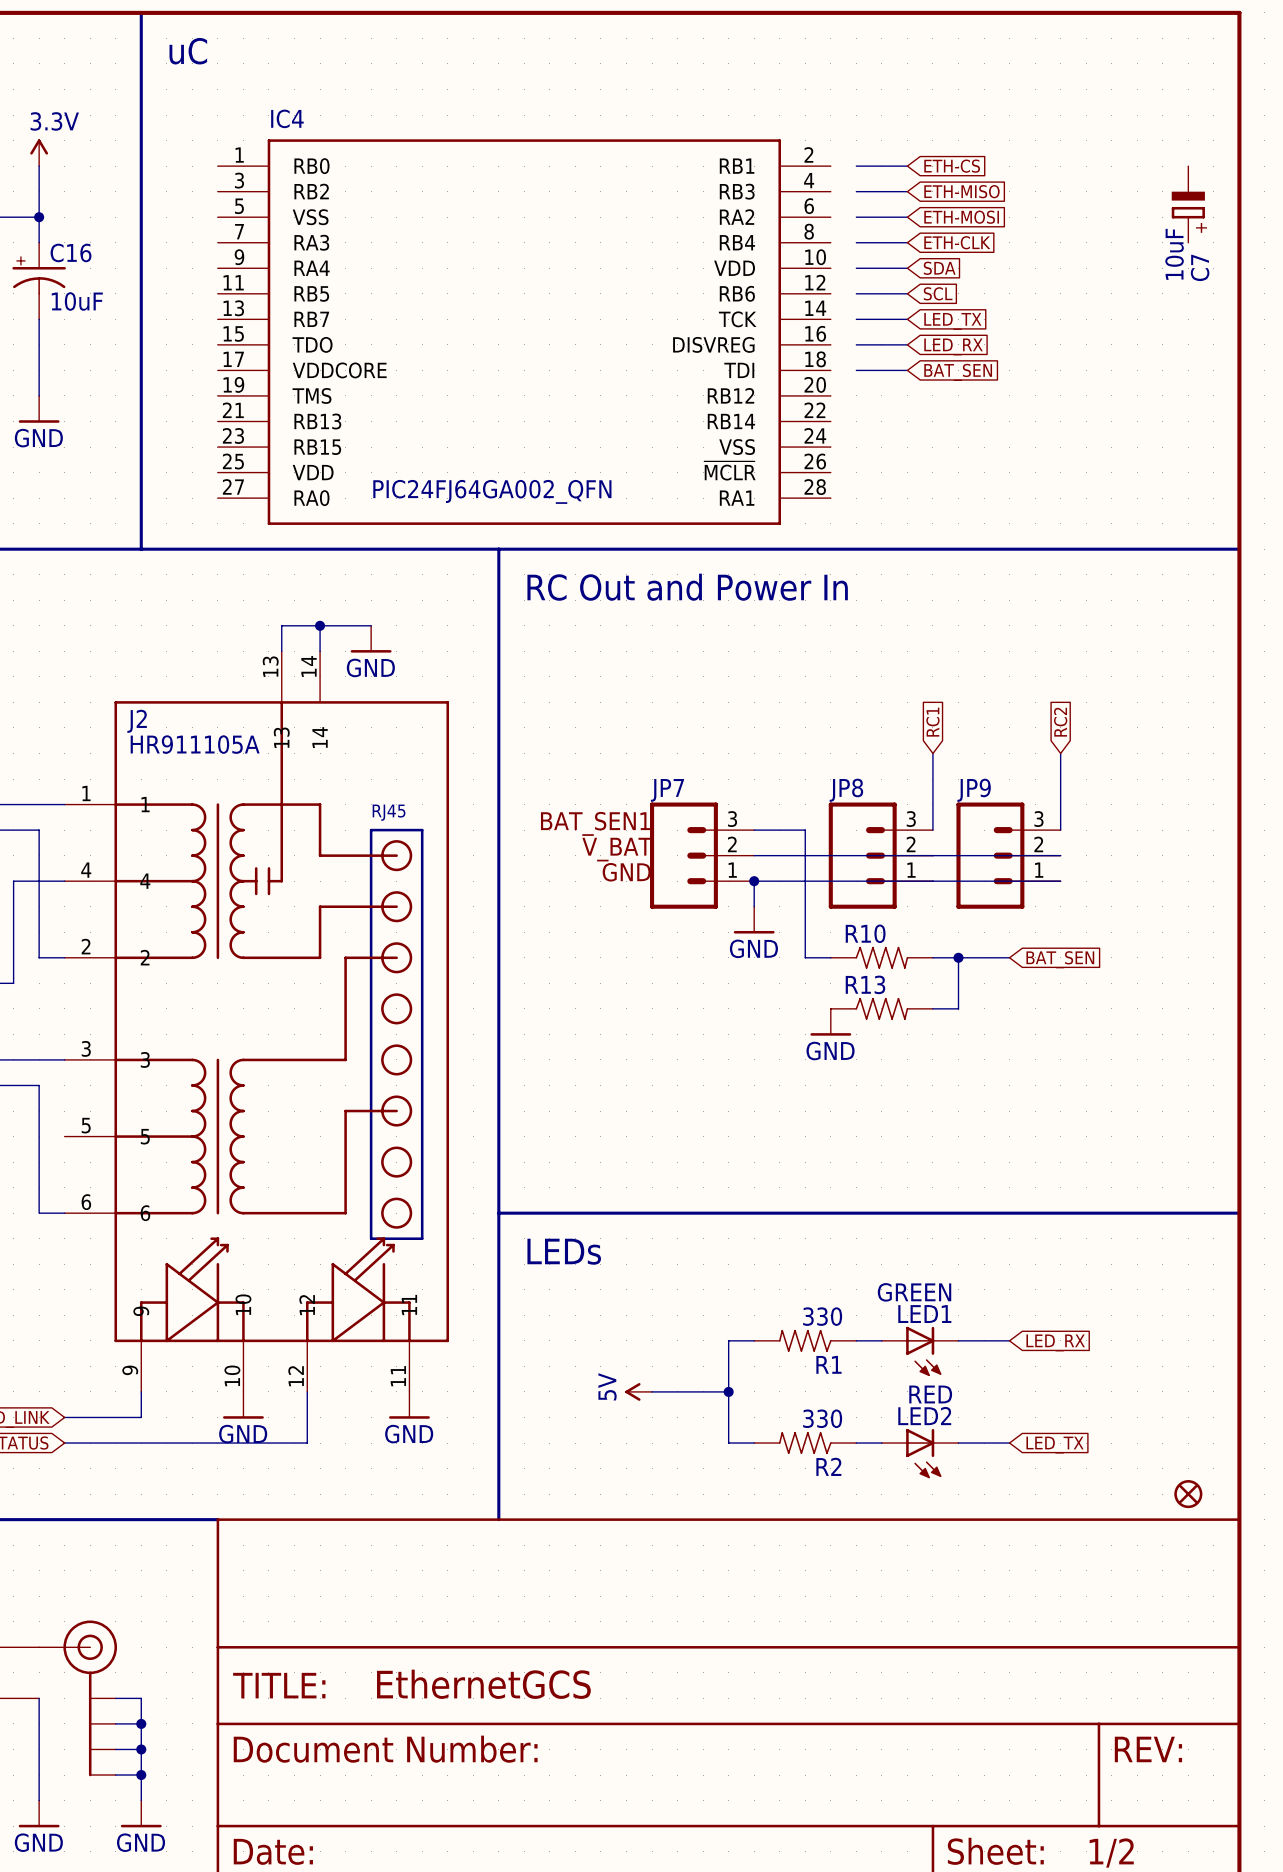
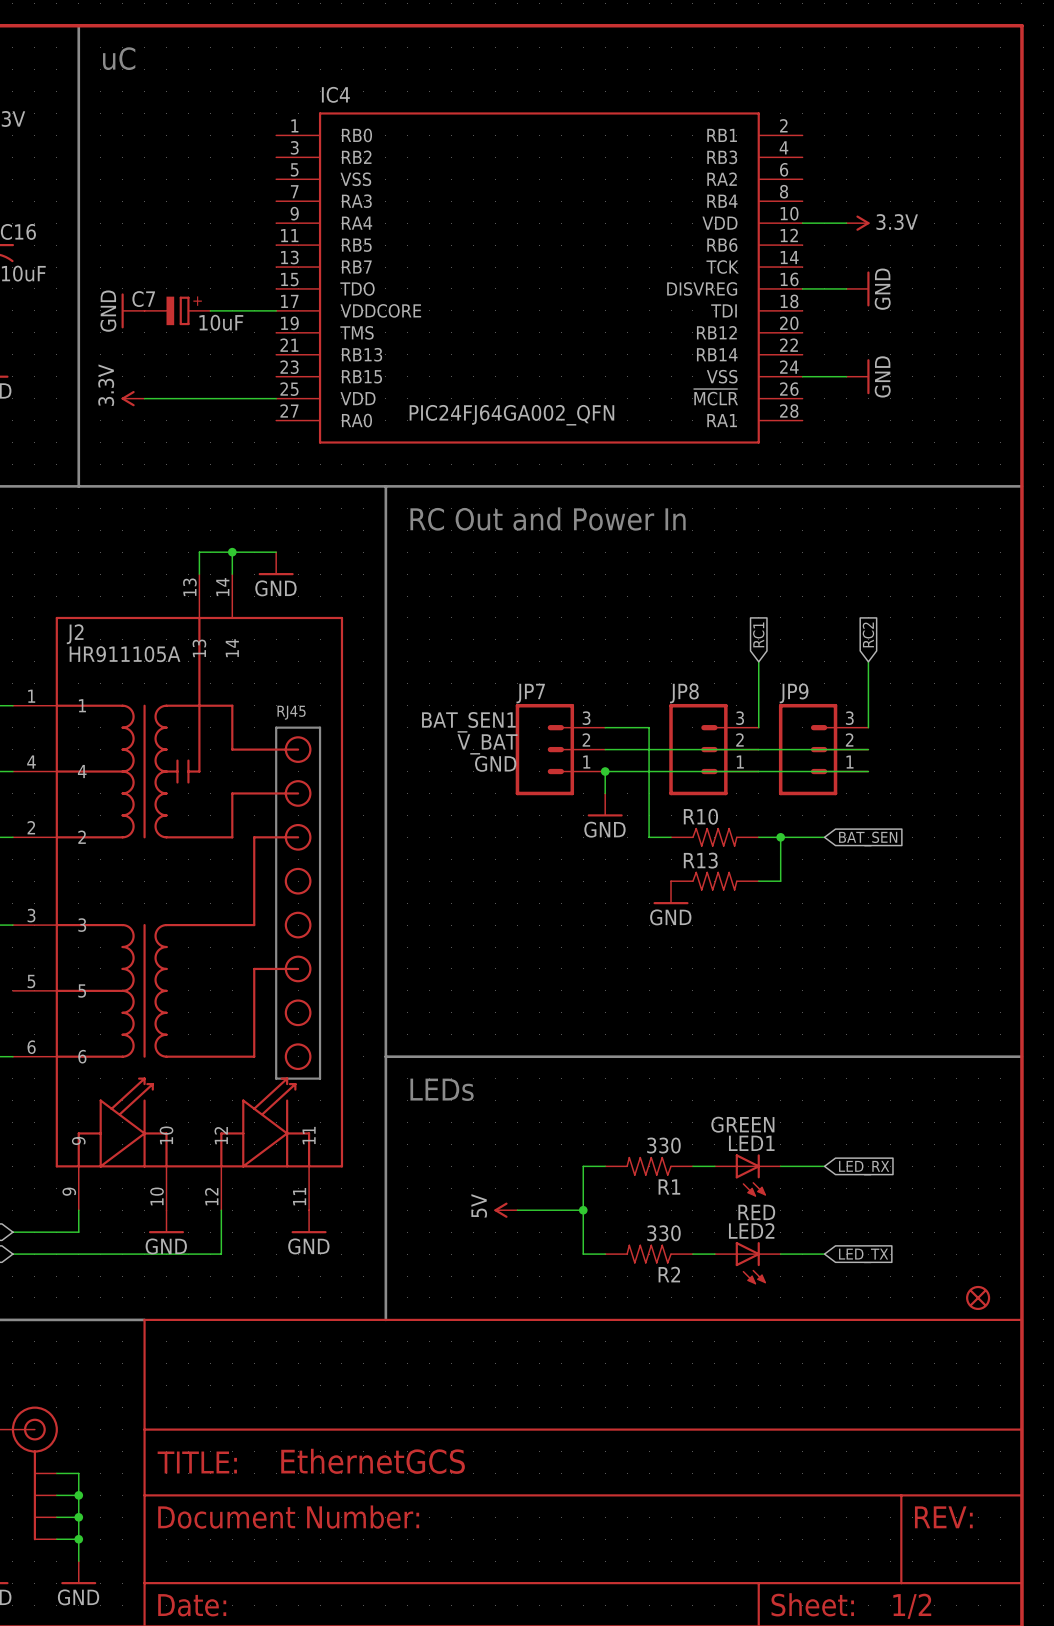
wire: (856, 166) (907, 166) -> none
global label: ETH-CS (952, 166) -> none
C7 symbol: [1171, 166, 1205, 243] -> [144, 296, 211, 326]
wire: (856, 191) (907, 191) -> (802, 223) (846, 223)
global label: ETH-MISO (961, 191) -> none
wire: (856, 217) (907, 217) -> none
global label: ETH-MOSI (961, 217) -> none
wire: (856, 242) (907, 242) -> none
global label: ETH-CLK (957, 242) -> none
power symbol: none -> 3.3V (858, 223)
C7 value position: 10uF (1174, 254) -> 10uF (221, 322)
C7 name position: C7 (1200, 267) -> C7 (143, 299)
wire: (856, 268) (907, 268) -> (802, 288) (846, 288)
global label: SDA (939, 268) -> none
wire: (856, 293) (907, 293) -> none
global label: SCL (938, 293) -> none
wire: (856, 319) (907, 319) -> none
power symbol: none -> GND (858, 288)
global label: LED_TX (952, 321) -> none
IC4 position: (524, 332) -> (539, 277)
power symbol: none -> GND (133, 310)
wire: none -> (210, 310) (276, 310)
wire: (856, 344) (907, 344) -> none
global label: LED_RX (953, 346) -> none
wire: (856, 370) (907, 370) -> (802, 376) (846, 376)
global label: BAT_SEN (958, 372) -> none
power symbol: none -> GND (858, 376)
power symbol: none -> 3.3V (133, 398)
wire: none -> (144, 398) (276, 398)

